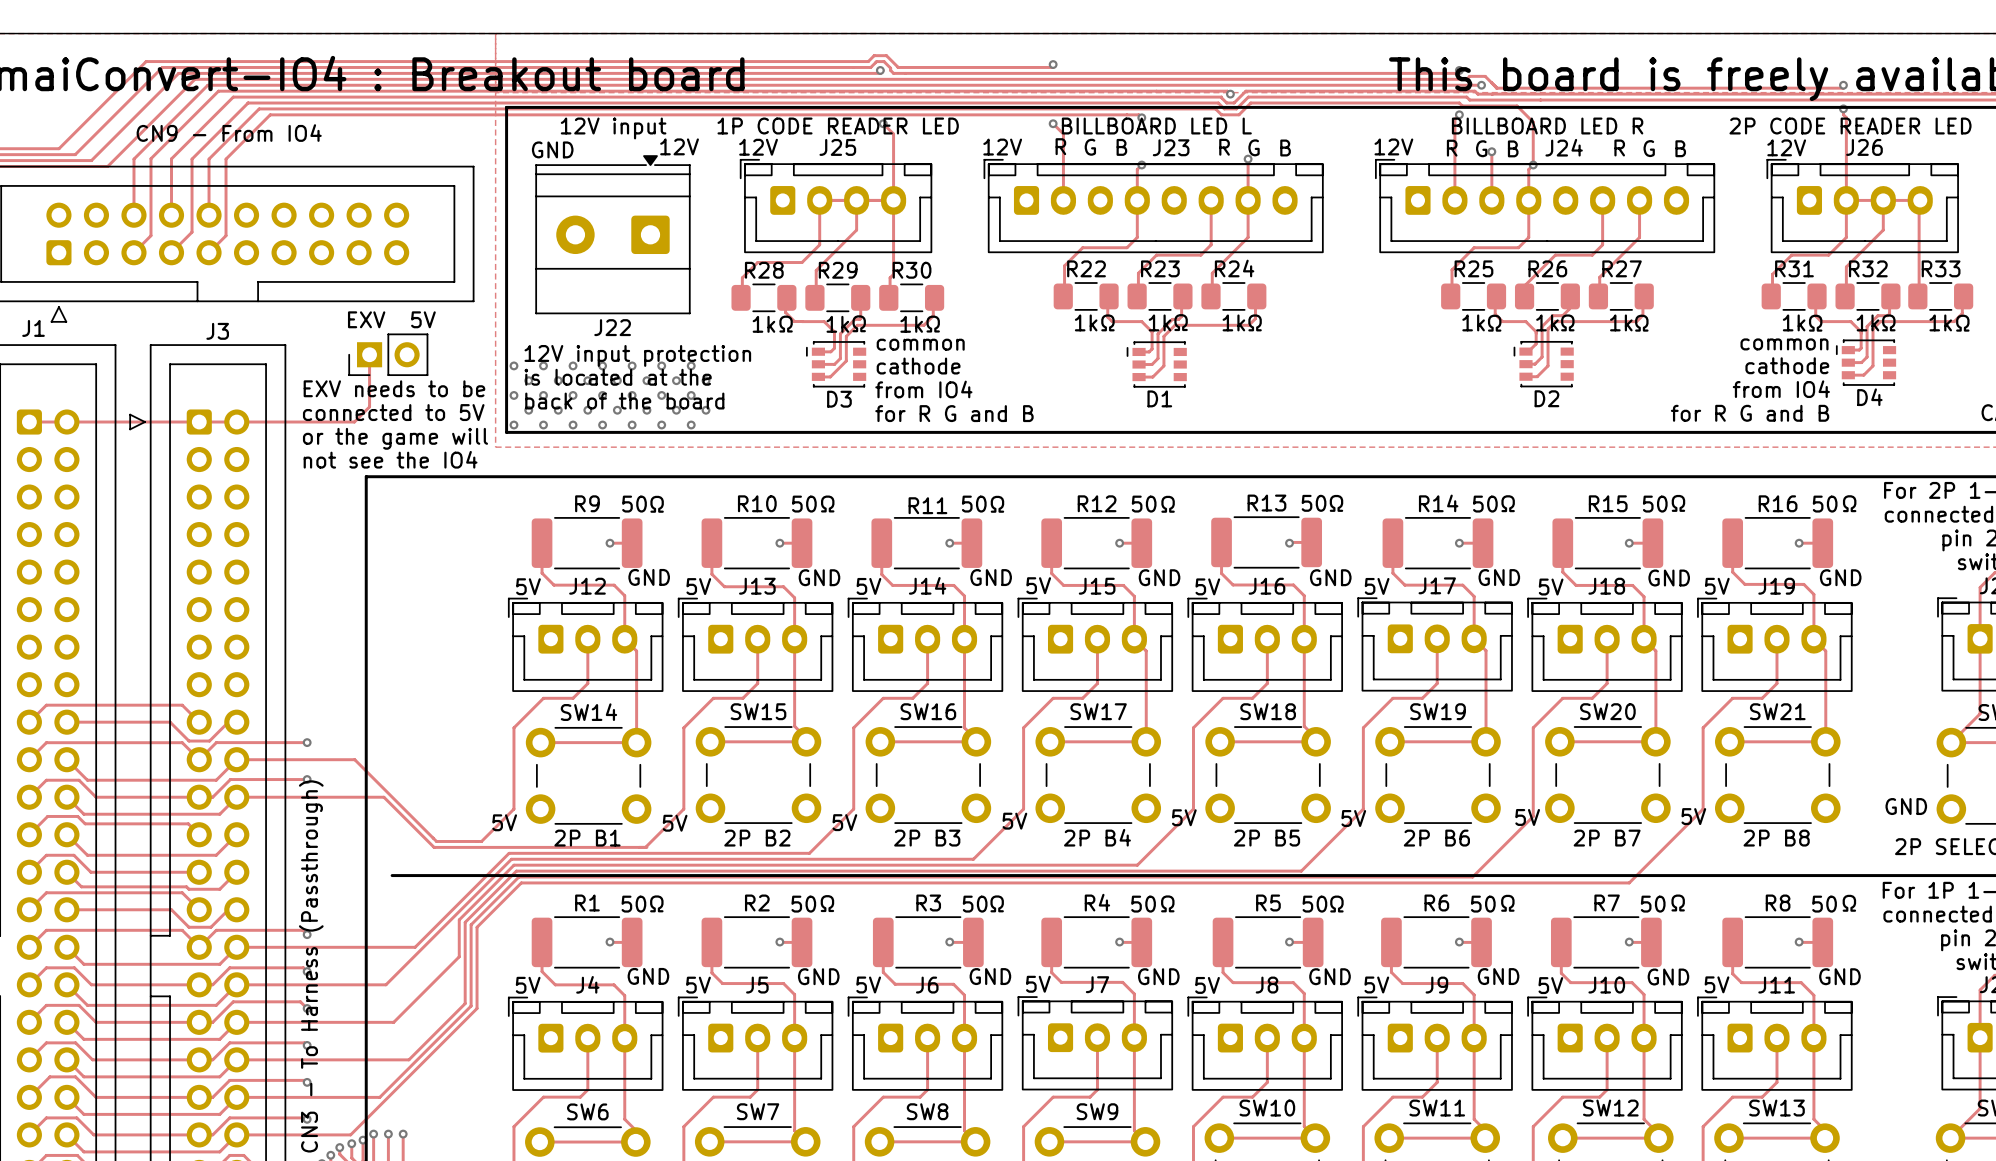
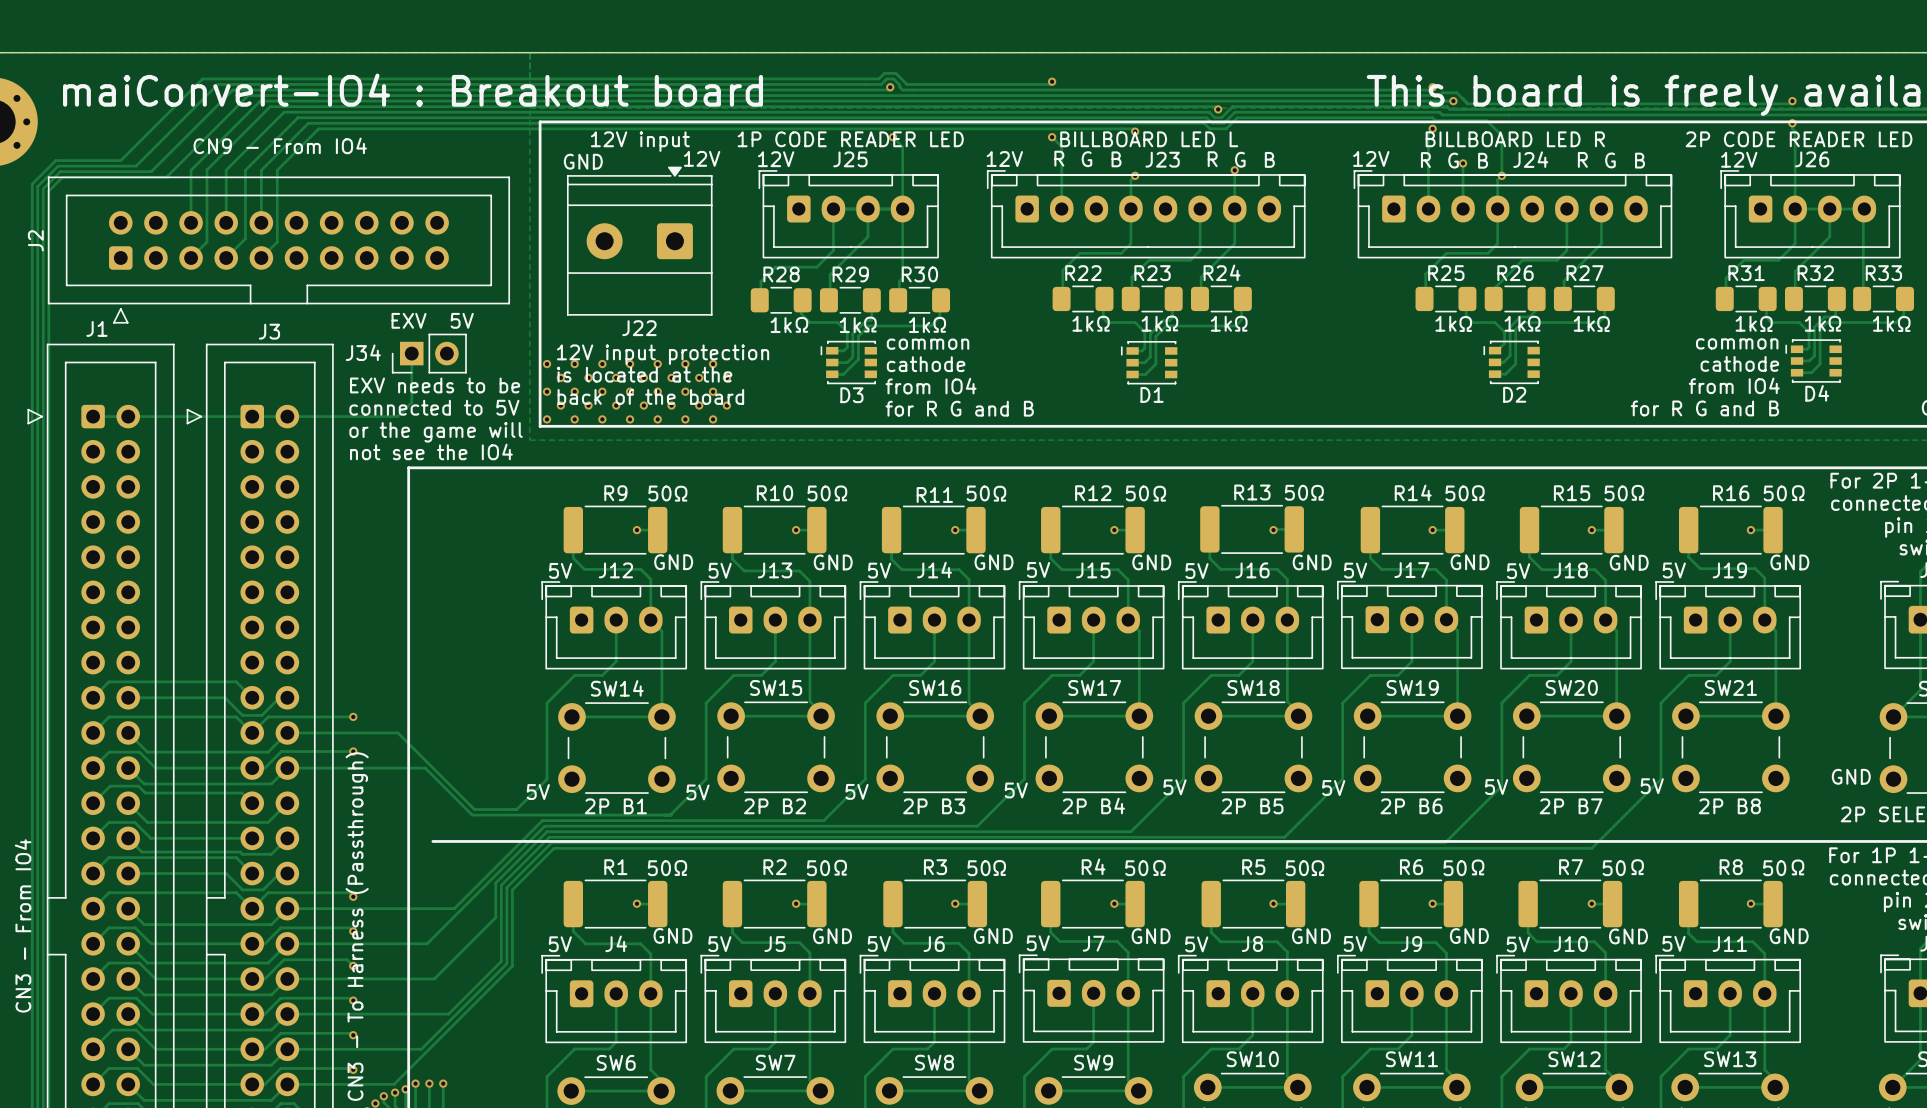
J34 name: none -> J34 (363, 352)

